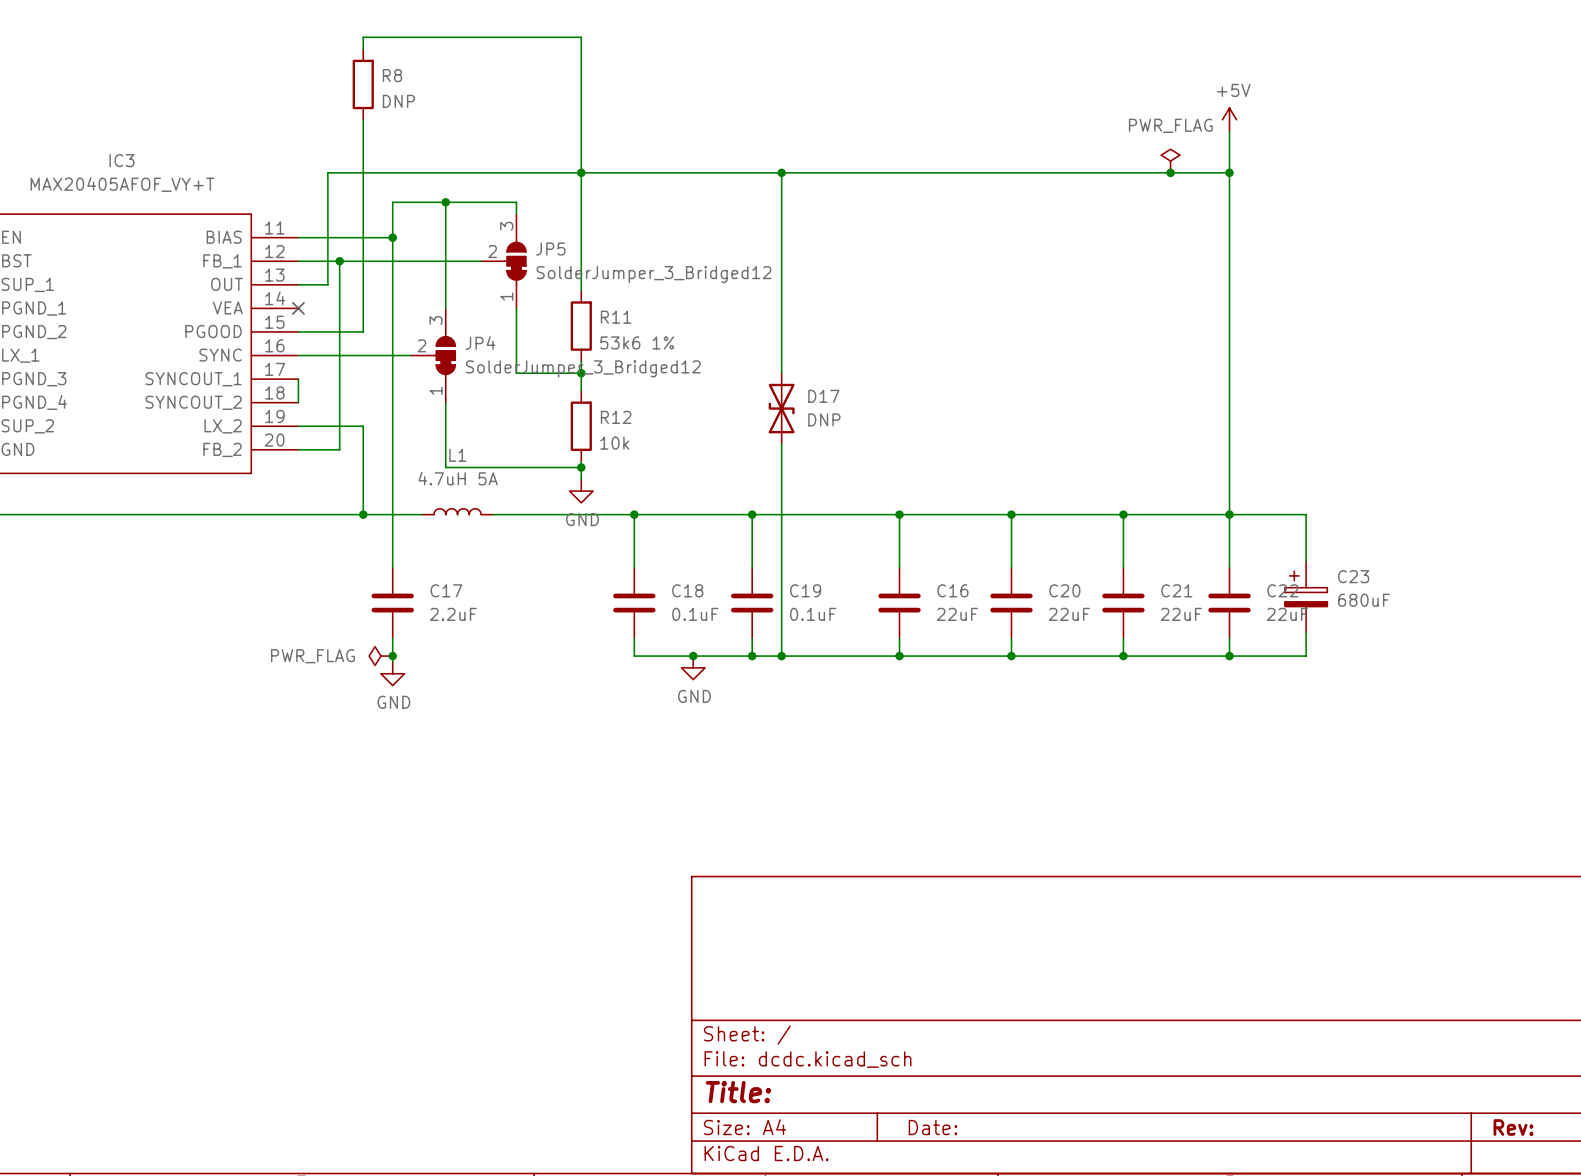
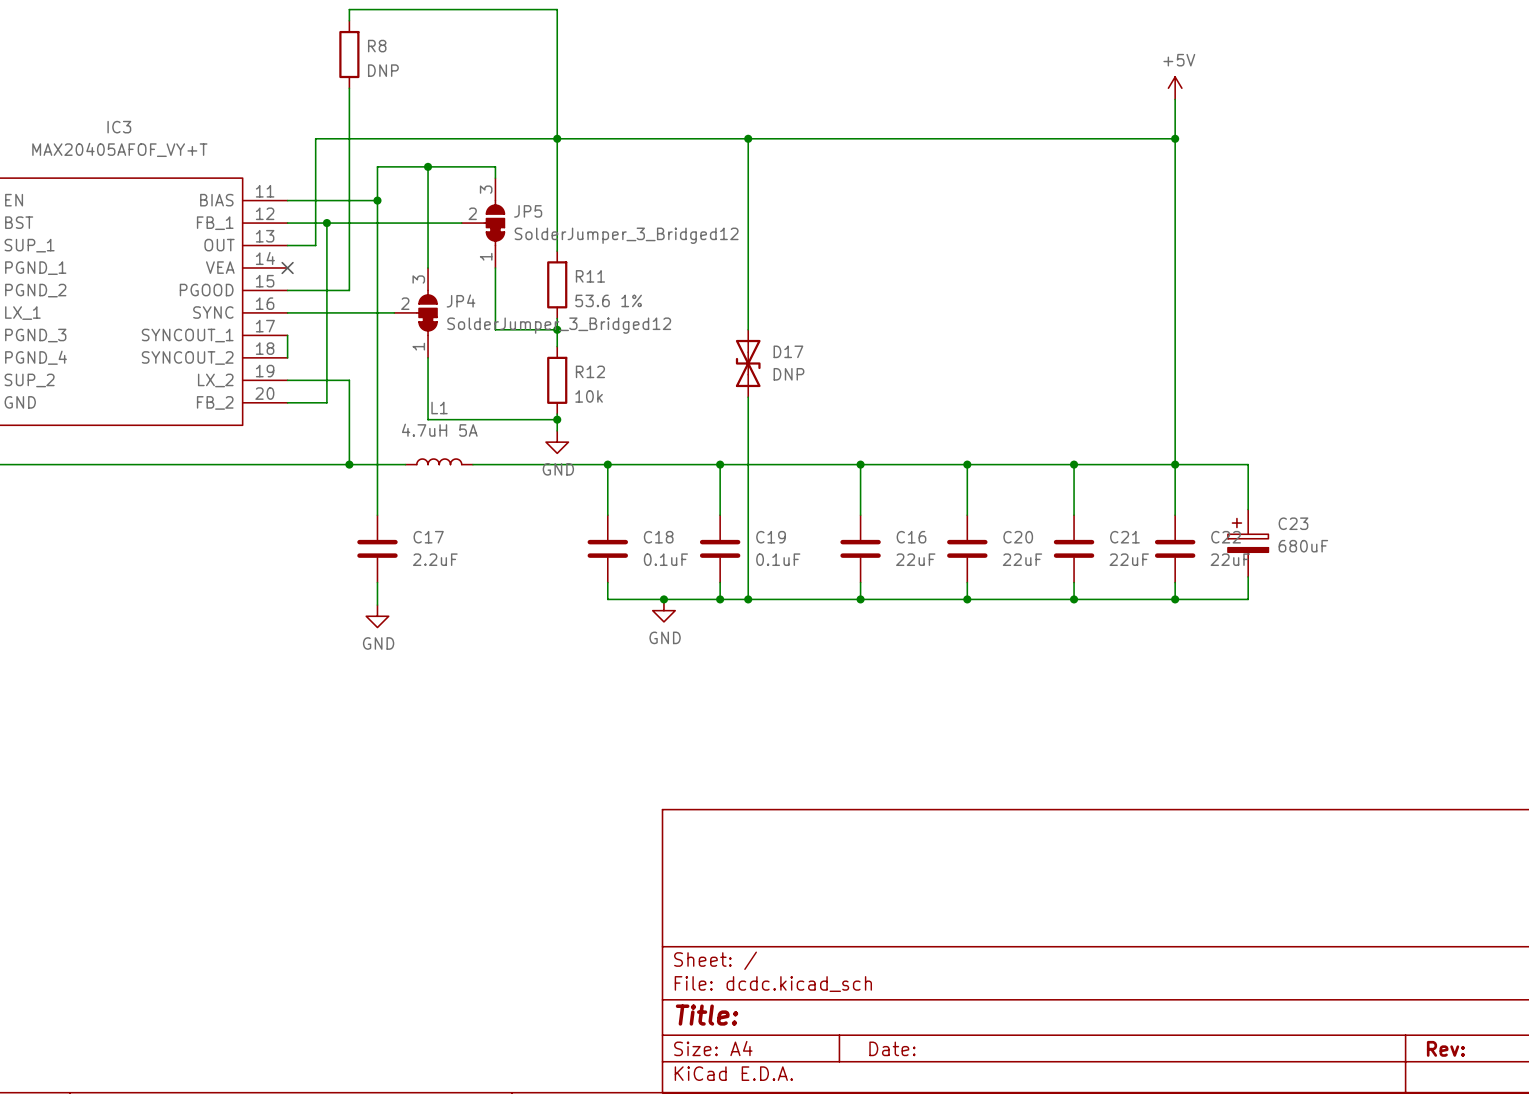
power symbol: PWR_FLAG (1170, 161) -> none
junction: (1170, 172) -> none
R11 value: 53k6 1% (637, 342) -> 53.6 1% (608, 300)
power symbol: PWR_FLAG (380, 656) -> none
junction: (392, 656) -> none

